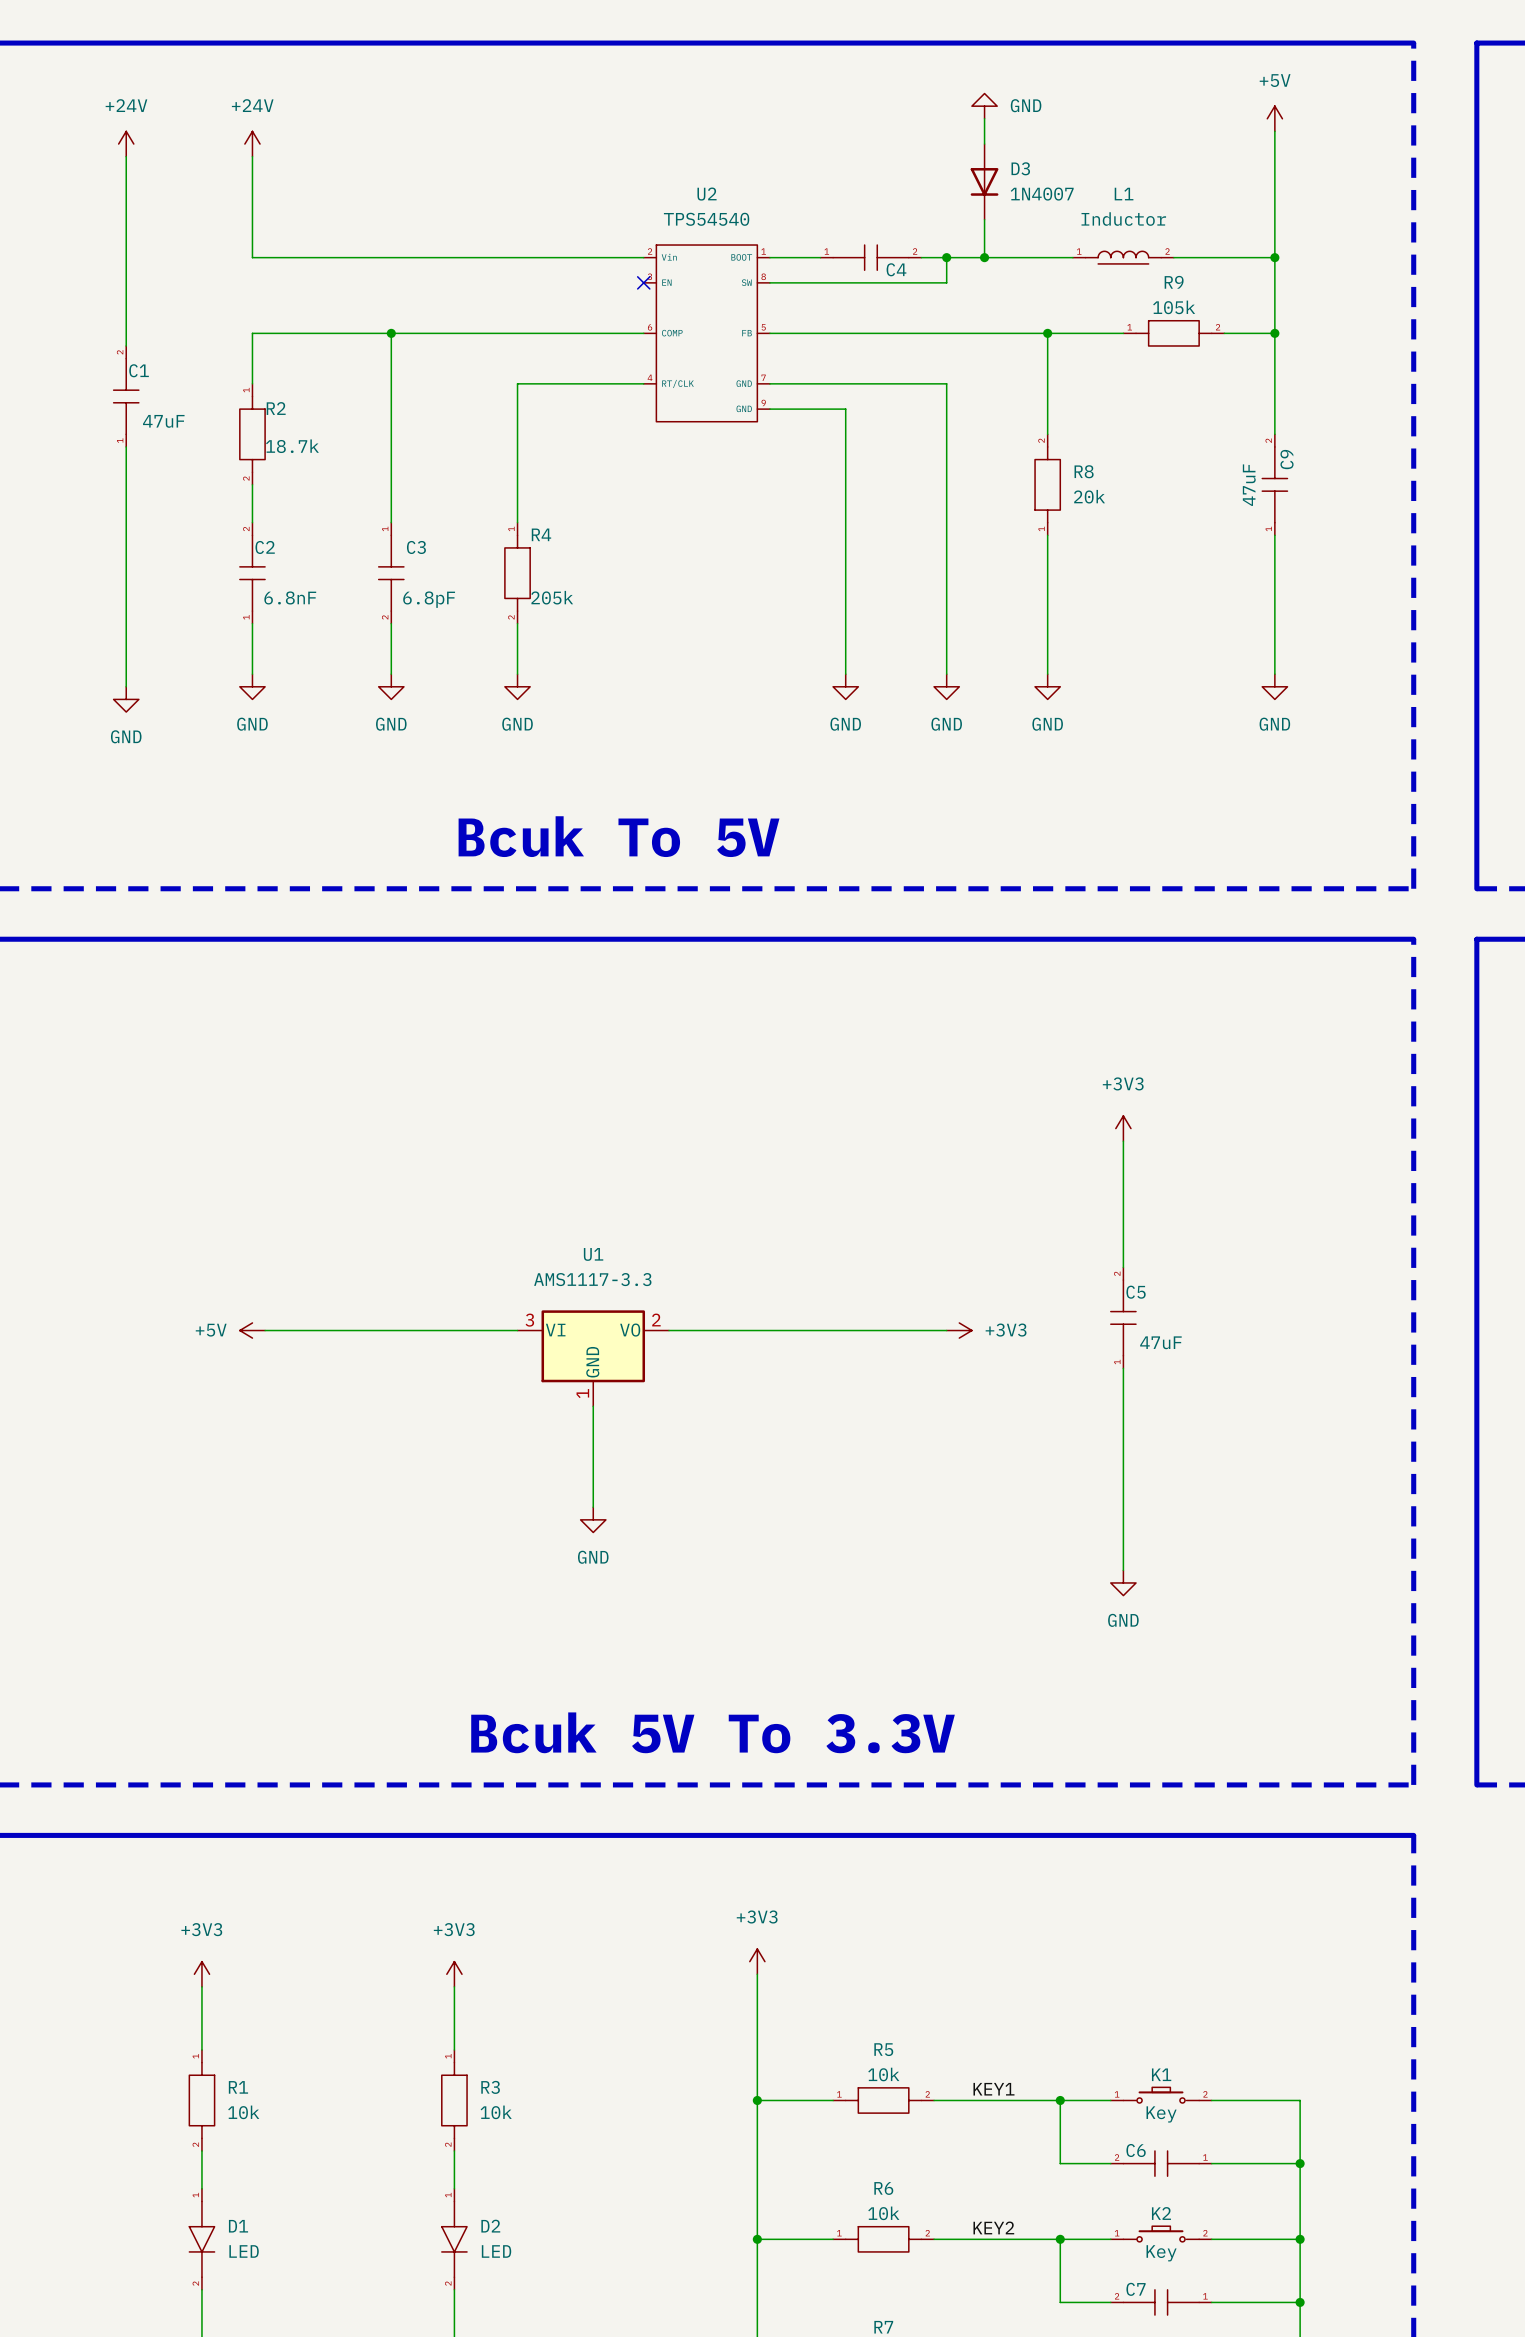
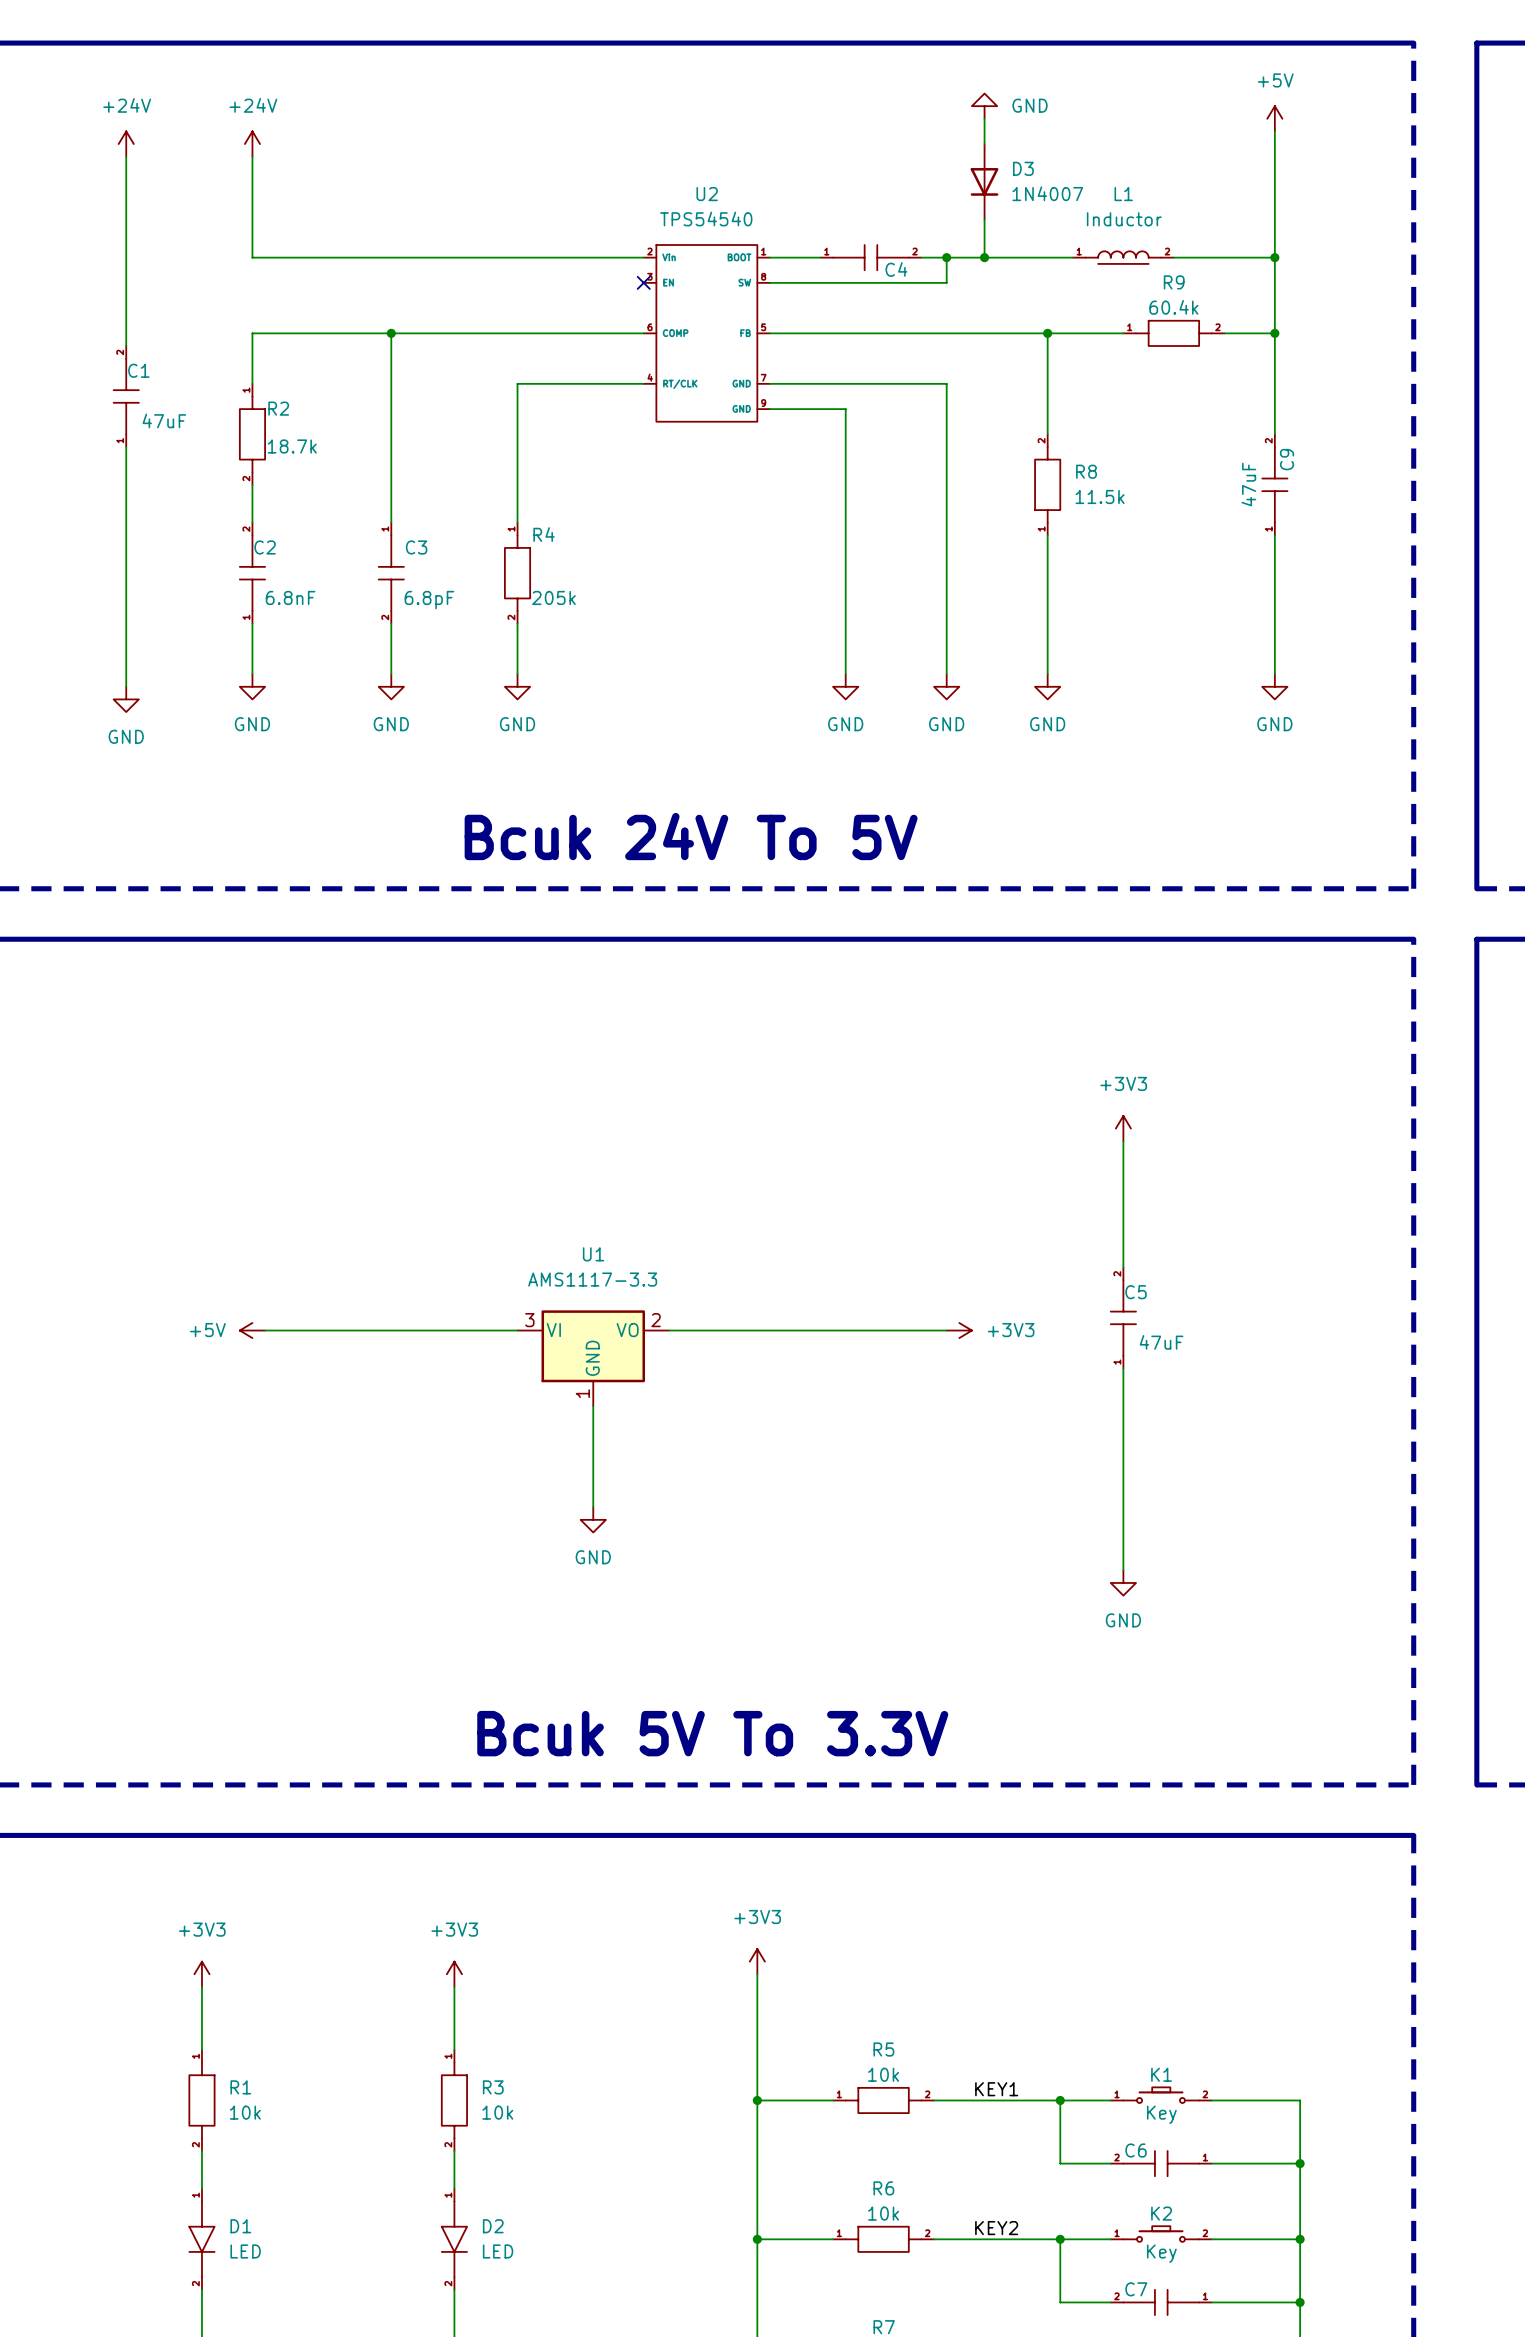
R9 value: 105k (1174, 307) -> 60.4k (1173, 307)
R8 value: 20k (1089, 496) -> 11.5k (1100, 496)
text: Bcuk To 5V (619, 836) -> Bcuk 24V To 5V (691, 836)

